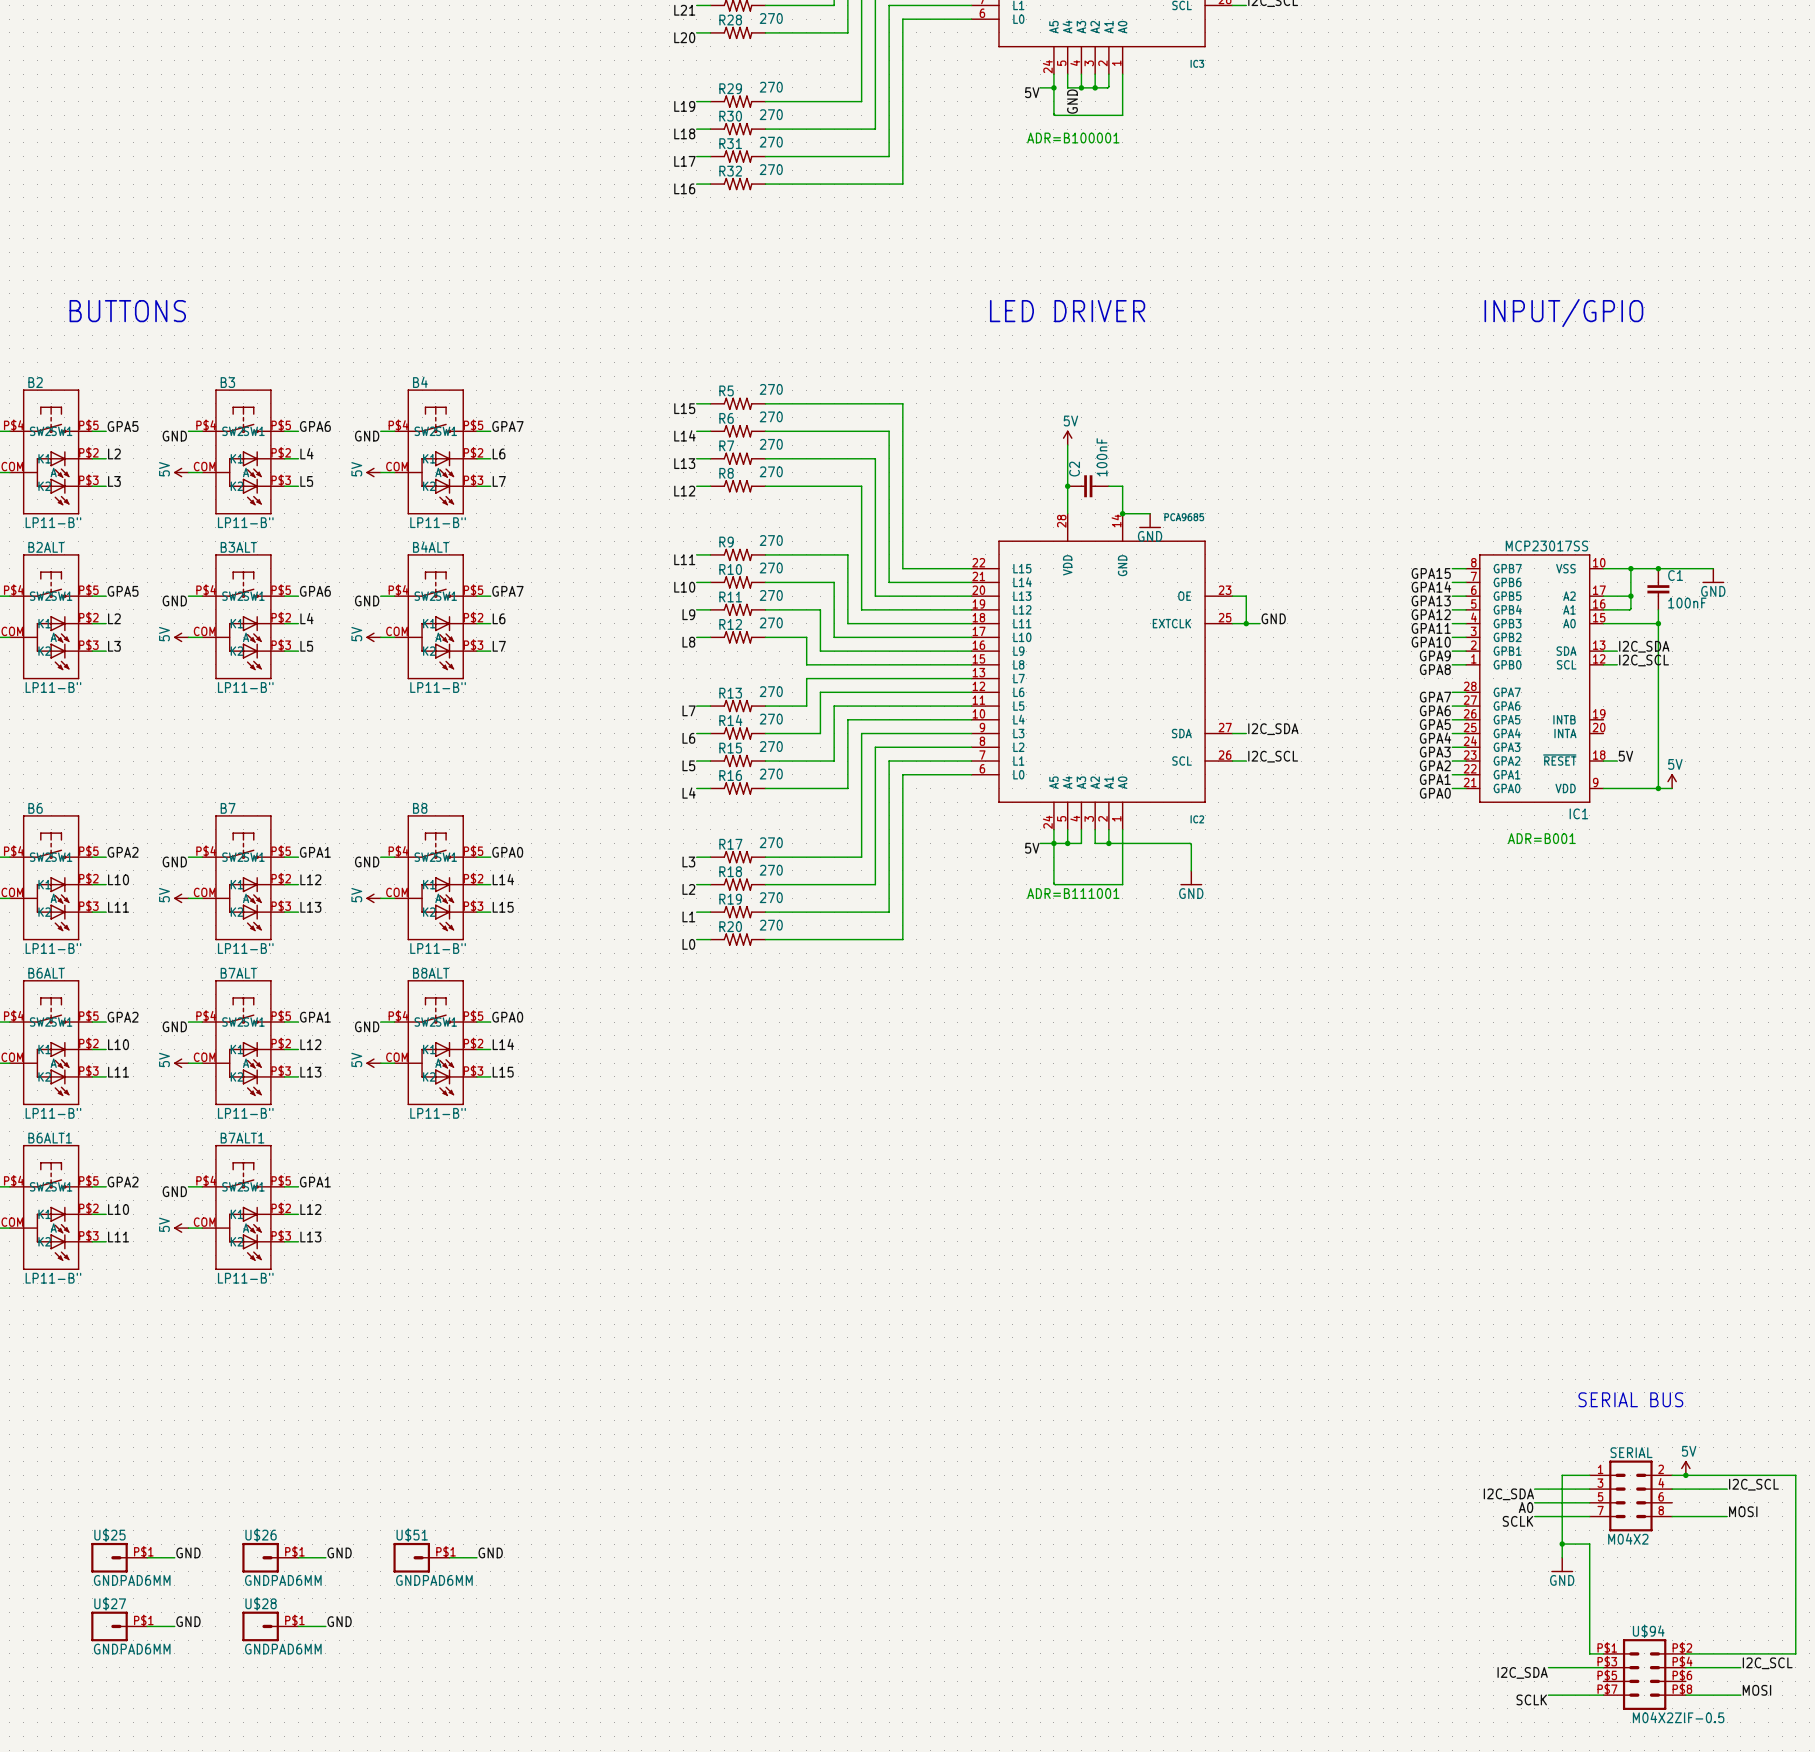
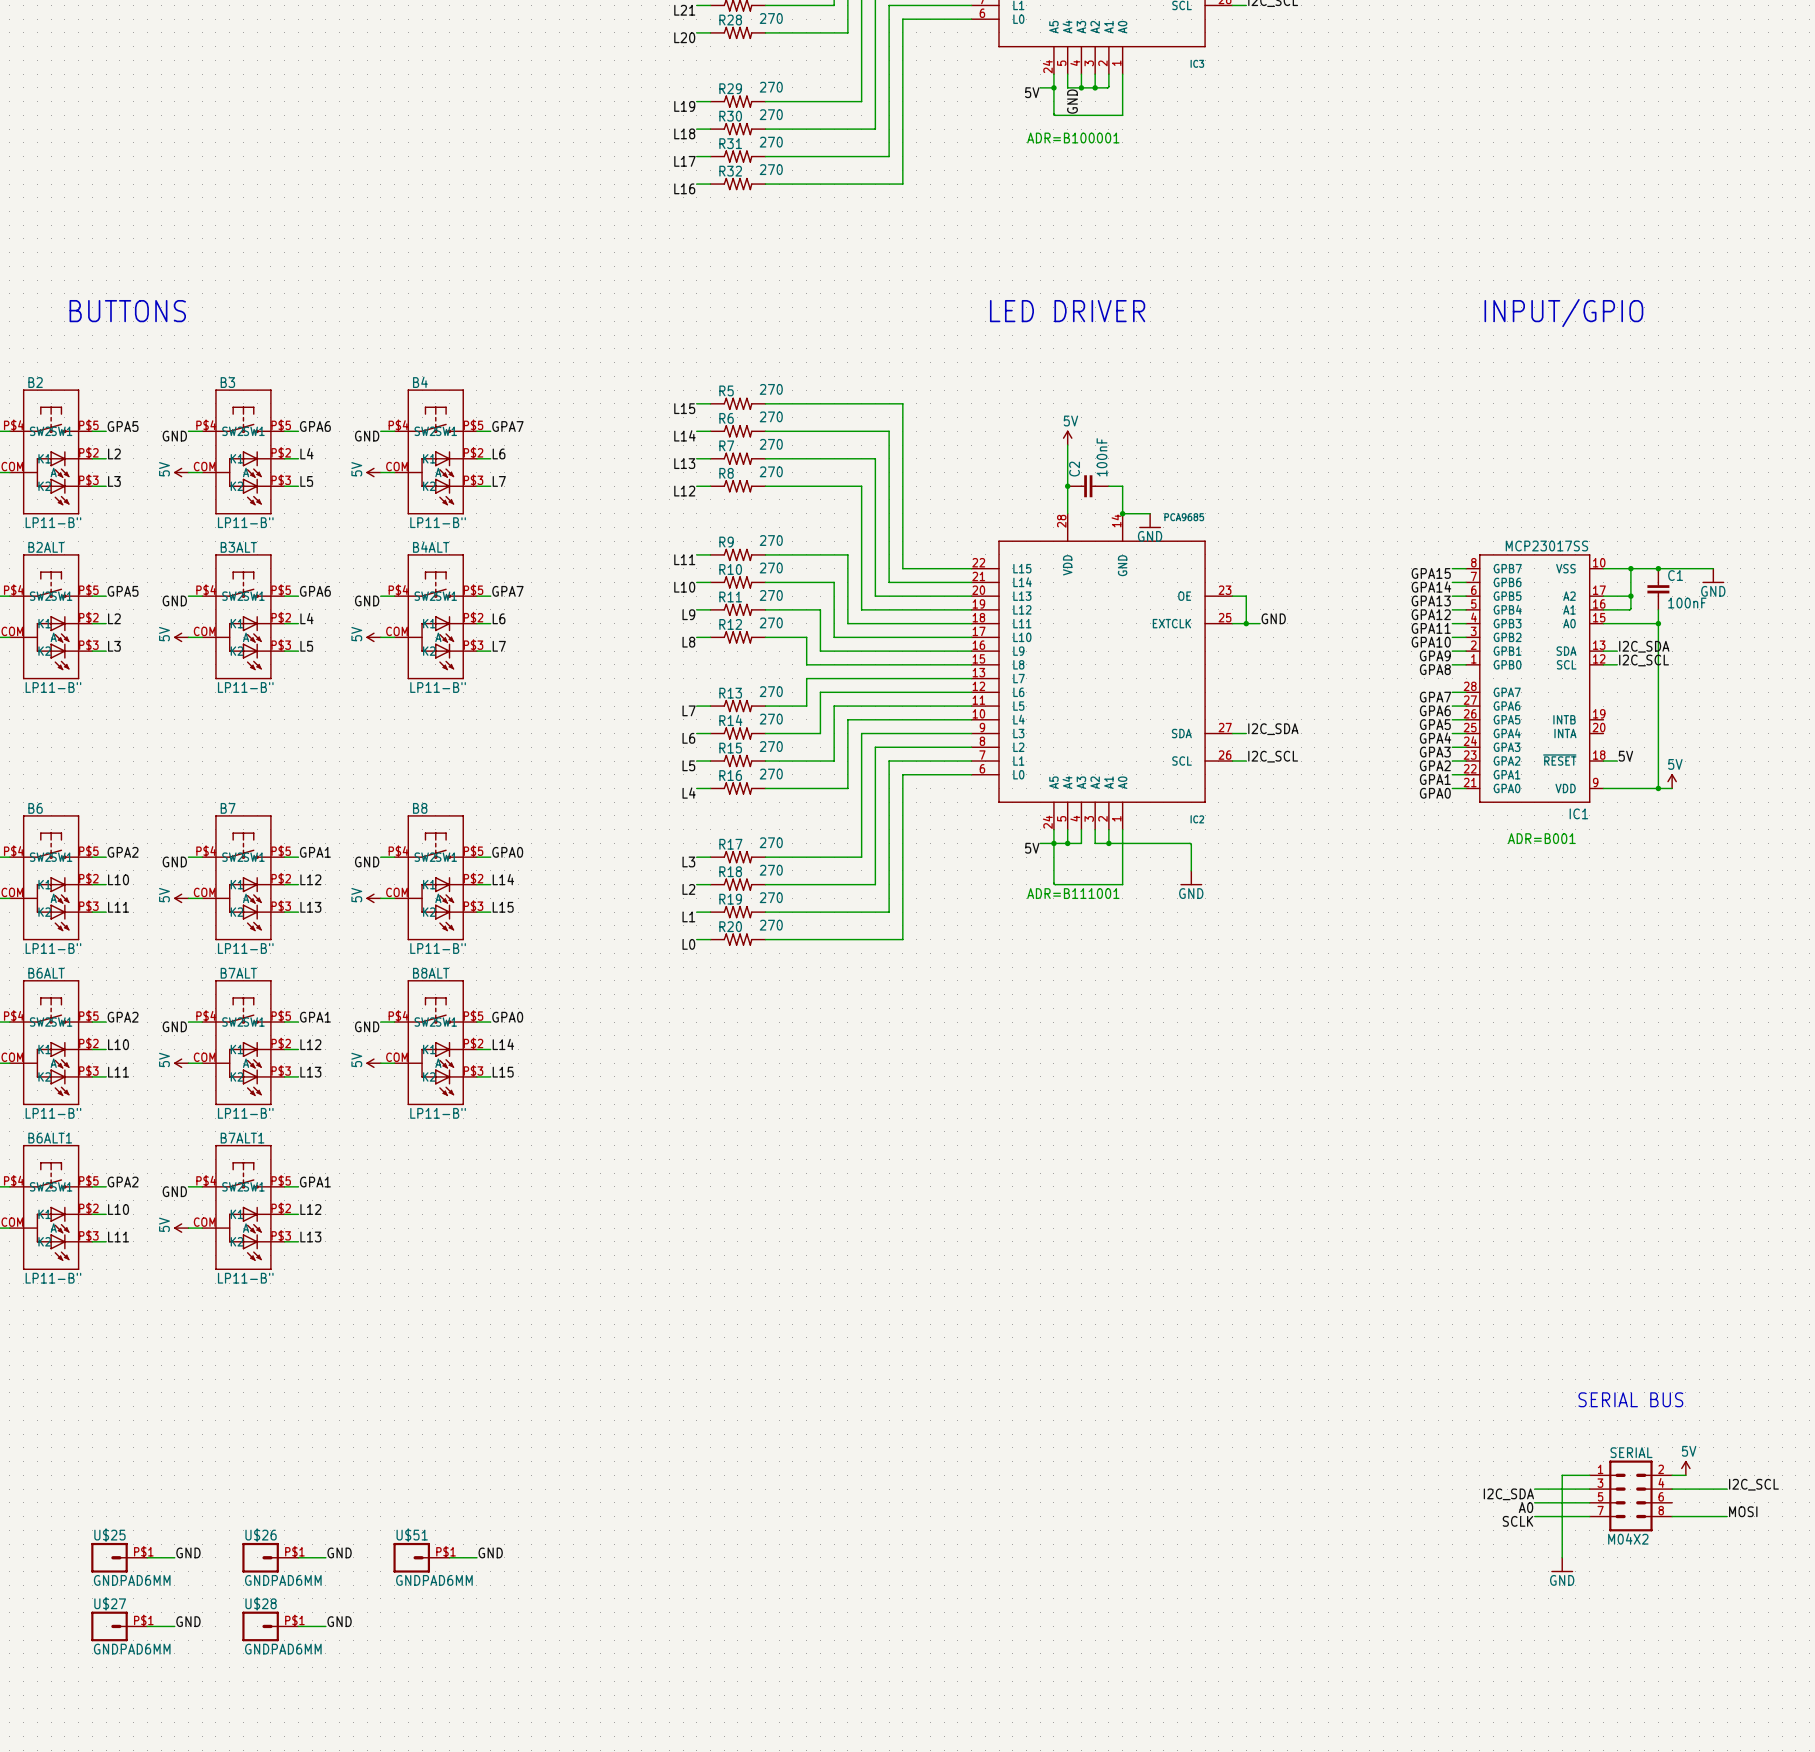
wire: (1685, 1475) (1795, 1475) (1795, 1653) (1685, 1653) -> none
junction: (1685, 1475) -> none
wire: (1562, 1544) (1589, 1544) (1589, 1653) (1603, 1653) -> none
junction: (1562, 1544) -> none
label: I2C_SCL (1767, 1663) -> none
wire: (1548, 1667) (1603, 1667) -> none
wire: (1685, 1667) (1740, 1667) -> none
label: I2C_SDA (1522, 1672) -> none
U$94: M04X2ZIF-0.5 (1644, 1674) -> none
label: MOSI (1756, 1690) -> none
wire: (1548, 1695) (1603, 1695) -> none
wire: (1685, 1695) (1740, 1695) -> none
label: SCLK (1531, 1699) -> none

